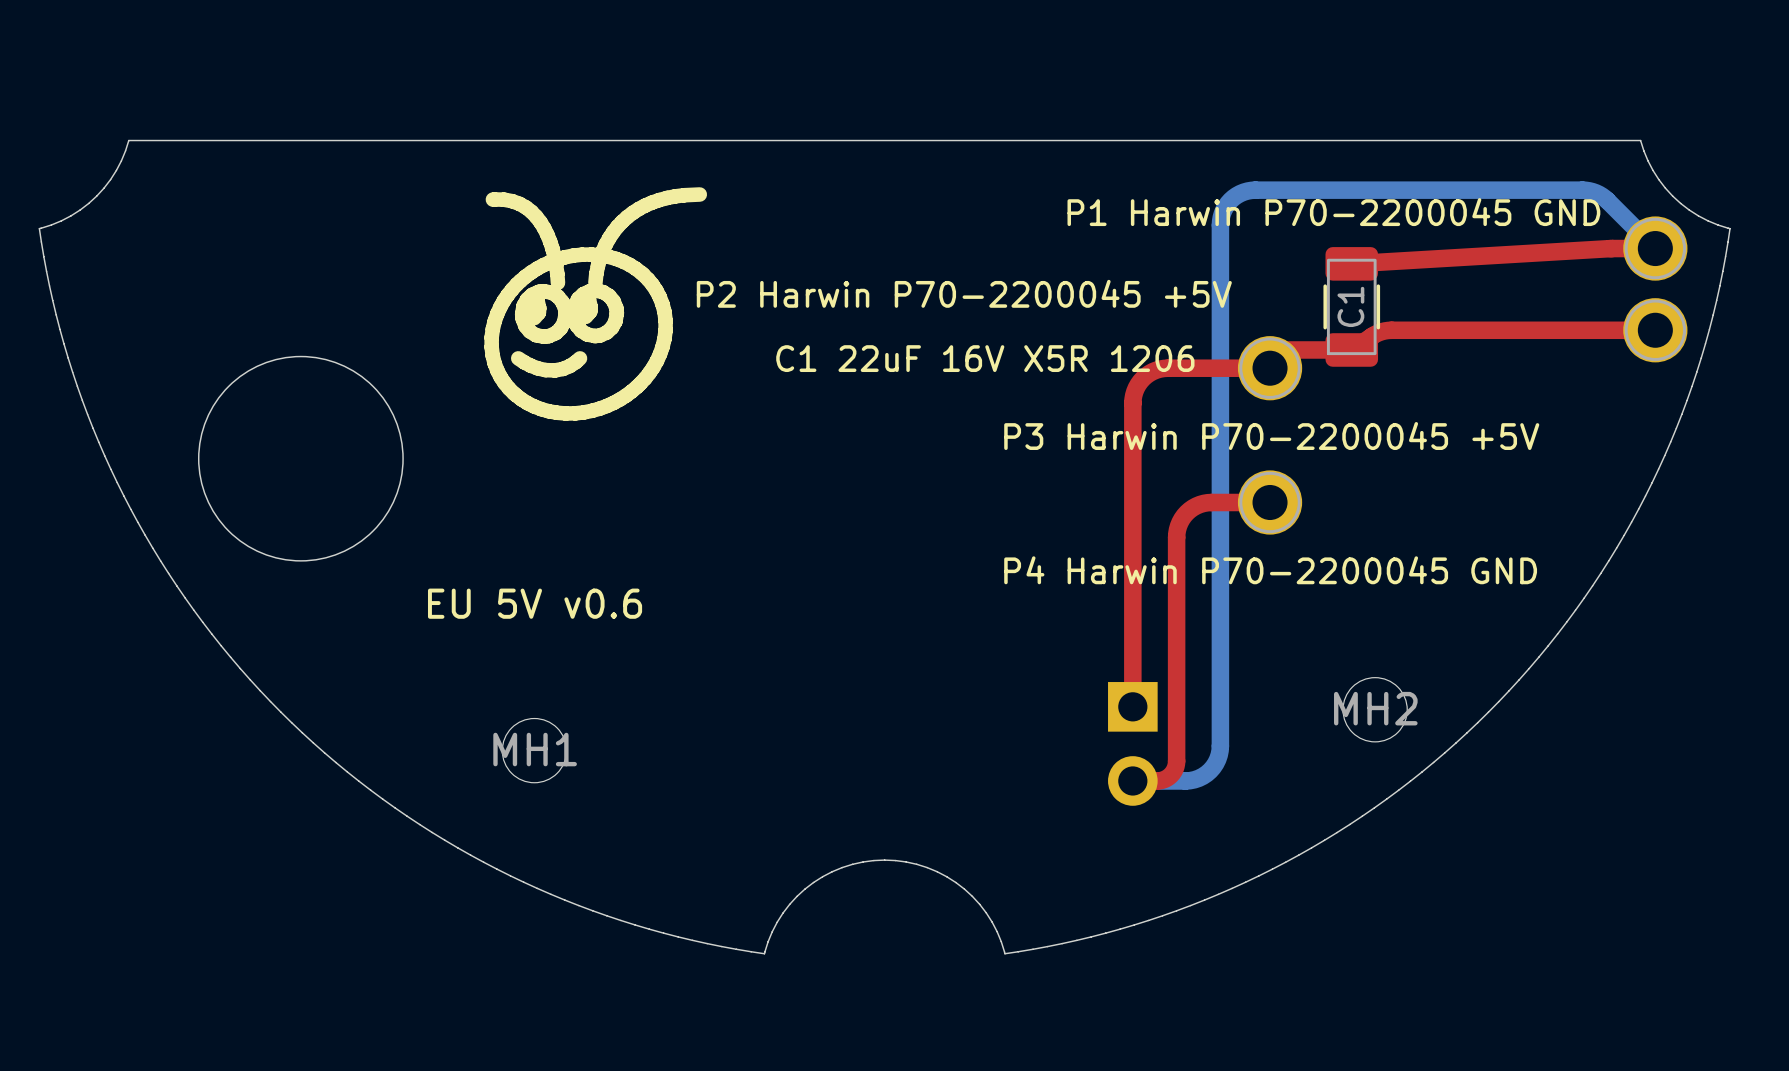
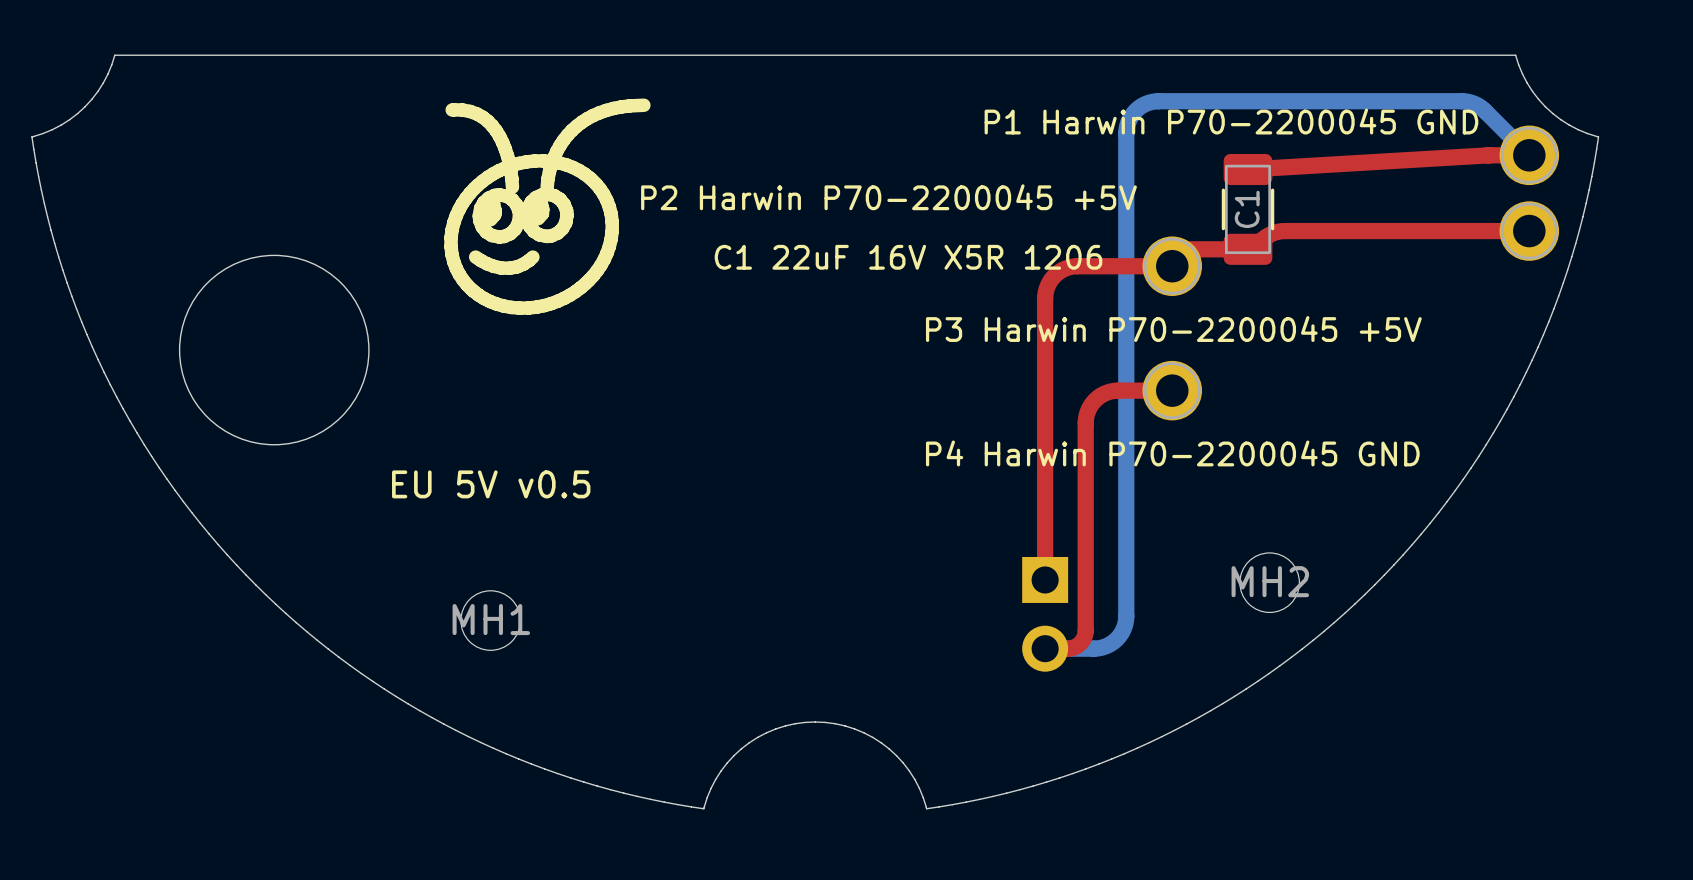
text: EU 5V v0.6 (535, 603) -> EU 5V v0.5 (491, 484)

